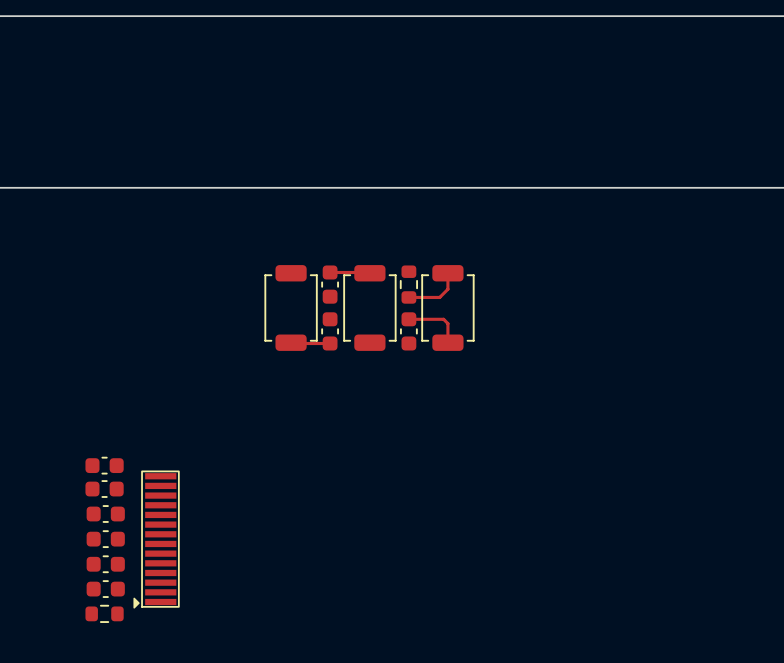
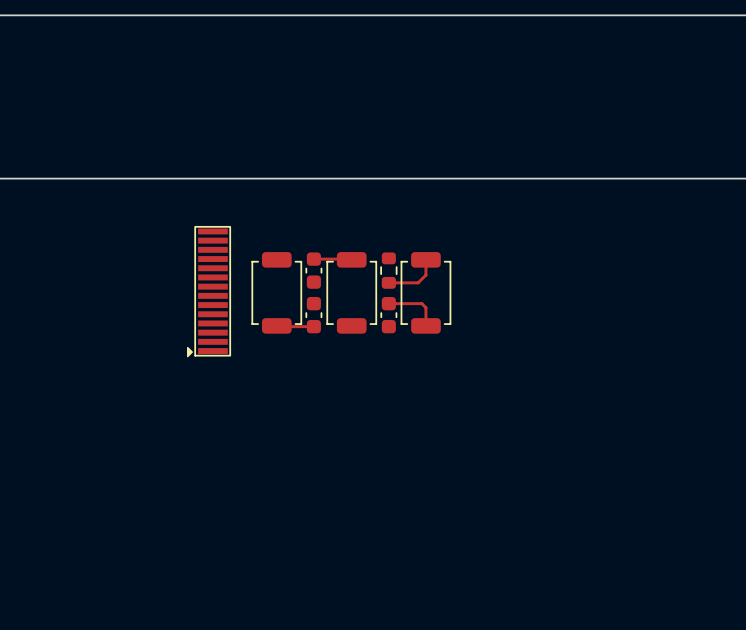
part: (104, 465) -> none
part: (104, 489) -> none
part: (105, 514) -> none
part: (105, 539) -> none
part position: (156, 539) -> (208, 291)
part: (105, 564) -> none
part: (105, 589) -> none
part: (104, 613) -> none

